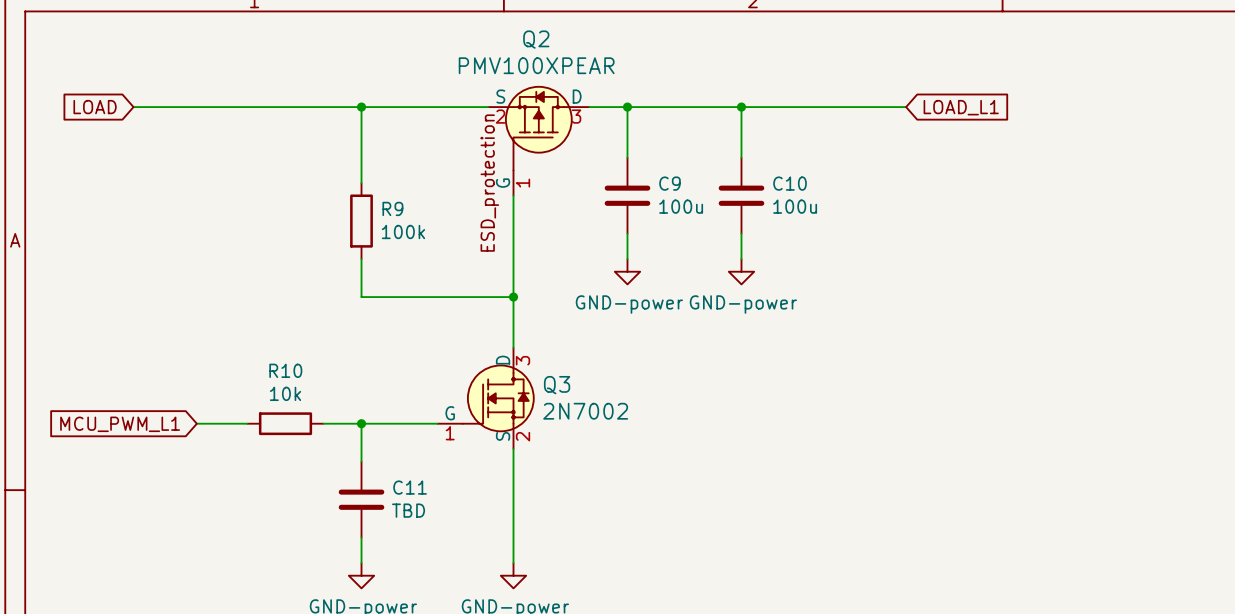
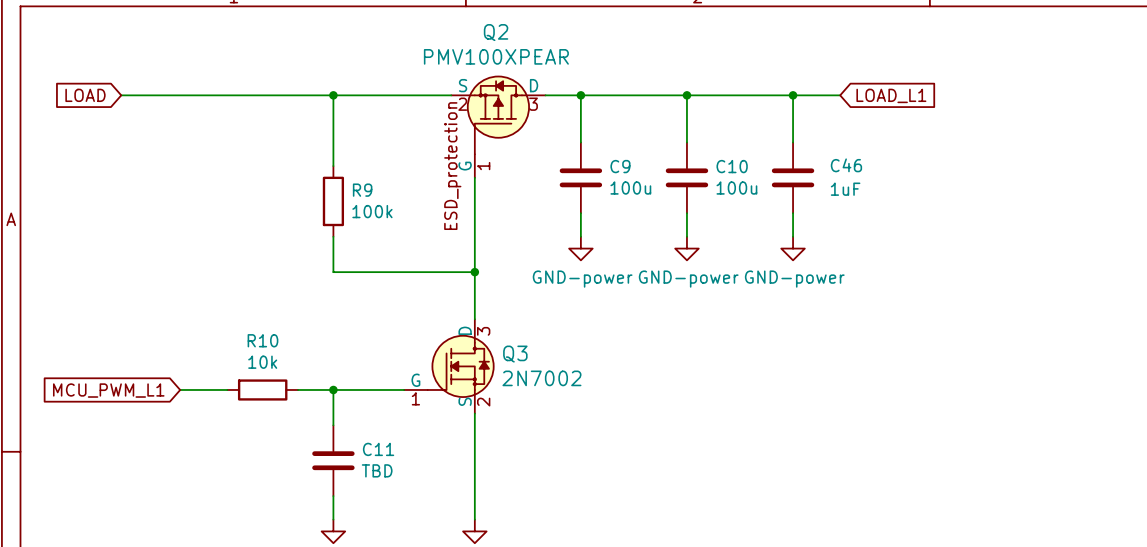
wire: none -> (793, 95) (793, 142)
junction: none -> (793, 95)
C46: none -> 1uF (793, 177)
wire: none -> (793, 213) (793, 236)
power symbol: none -> GND-power (793, 248)

